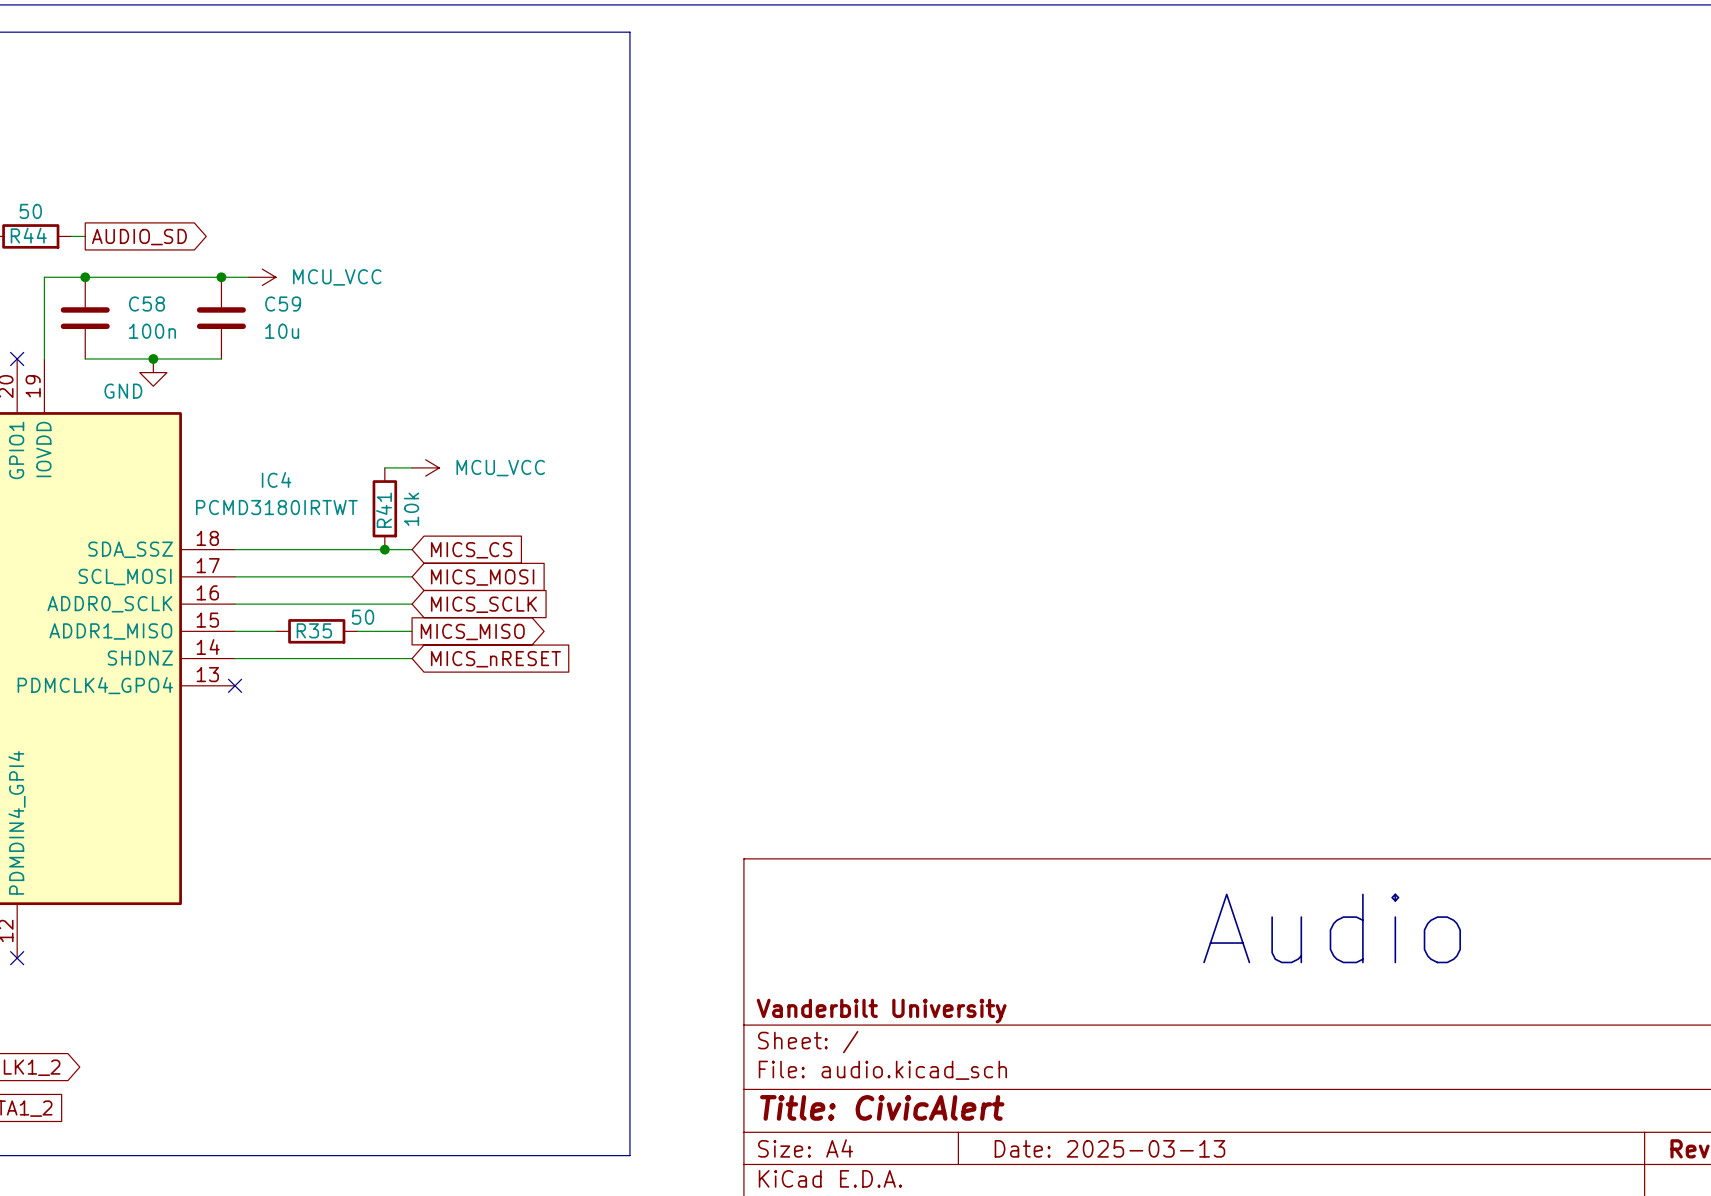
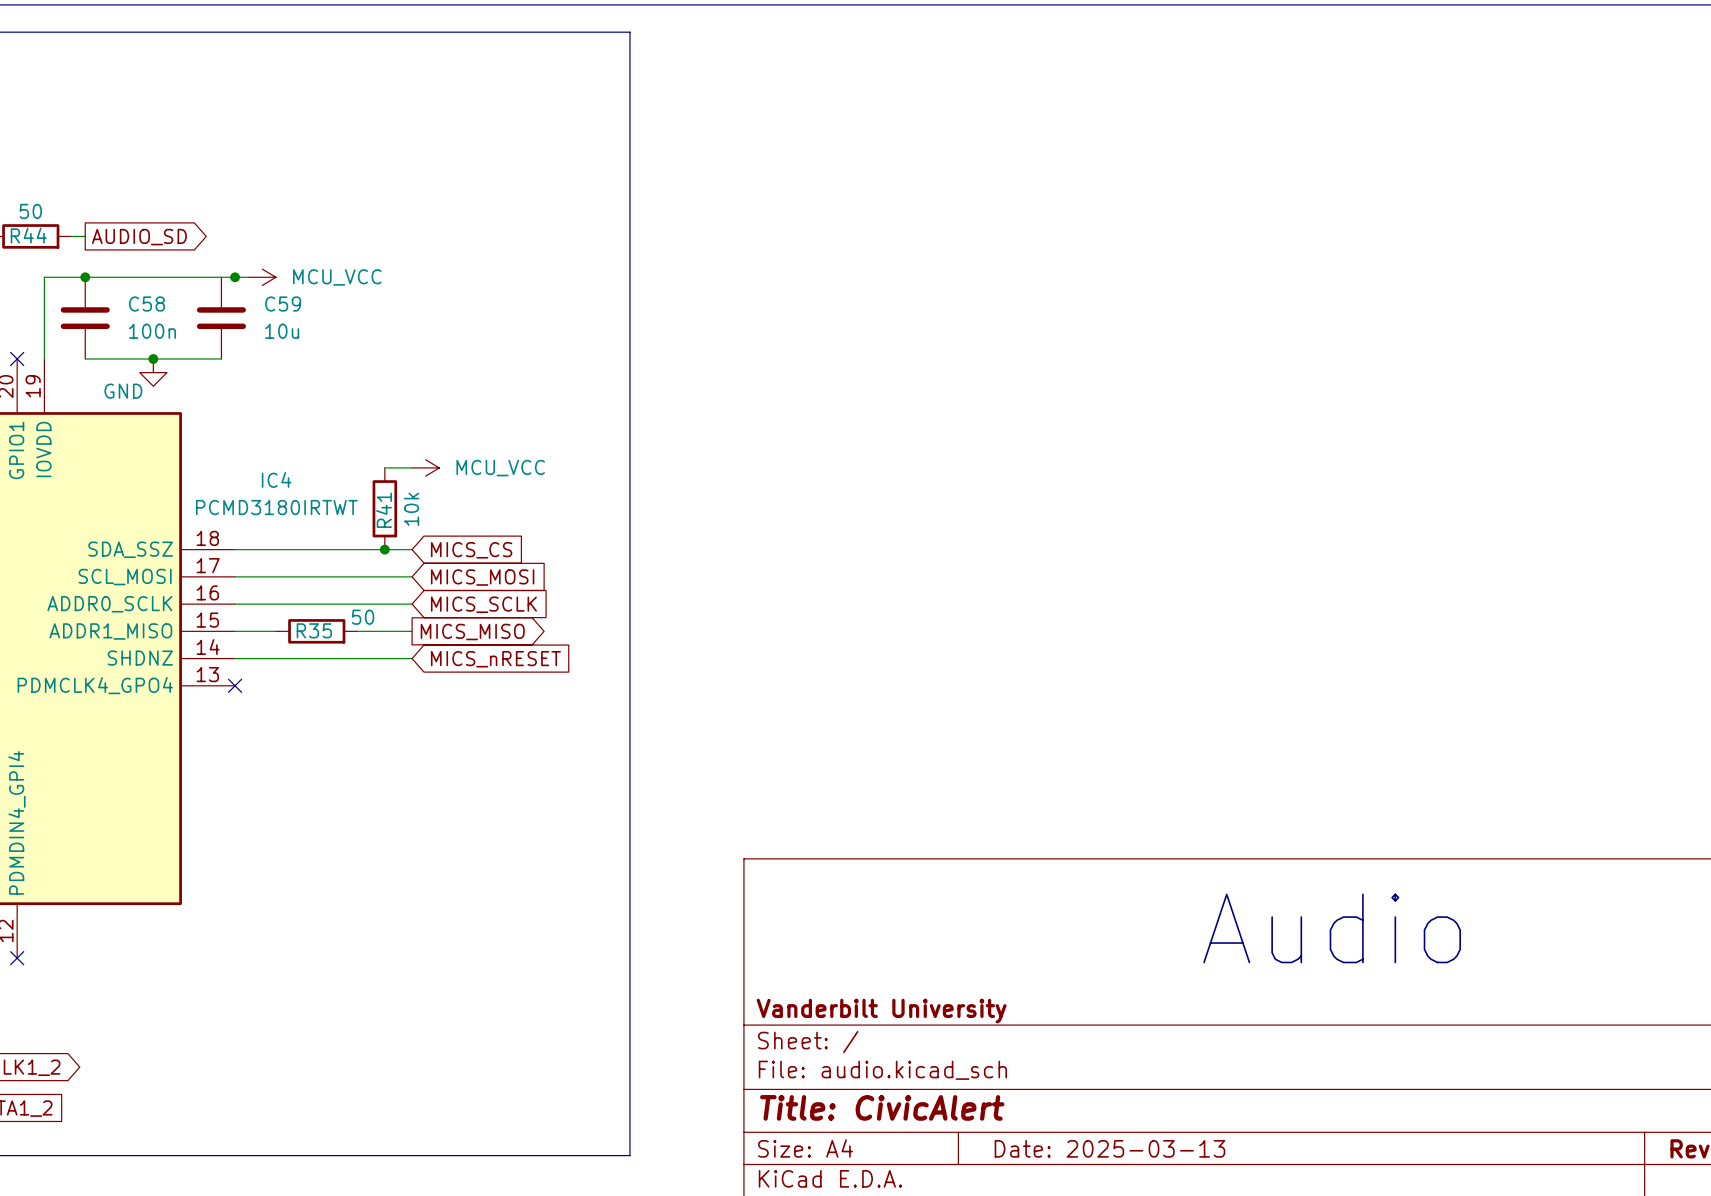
junction position: (221, 277) -> (235, 277)

